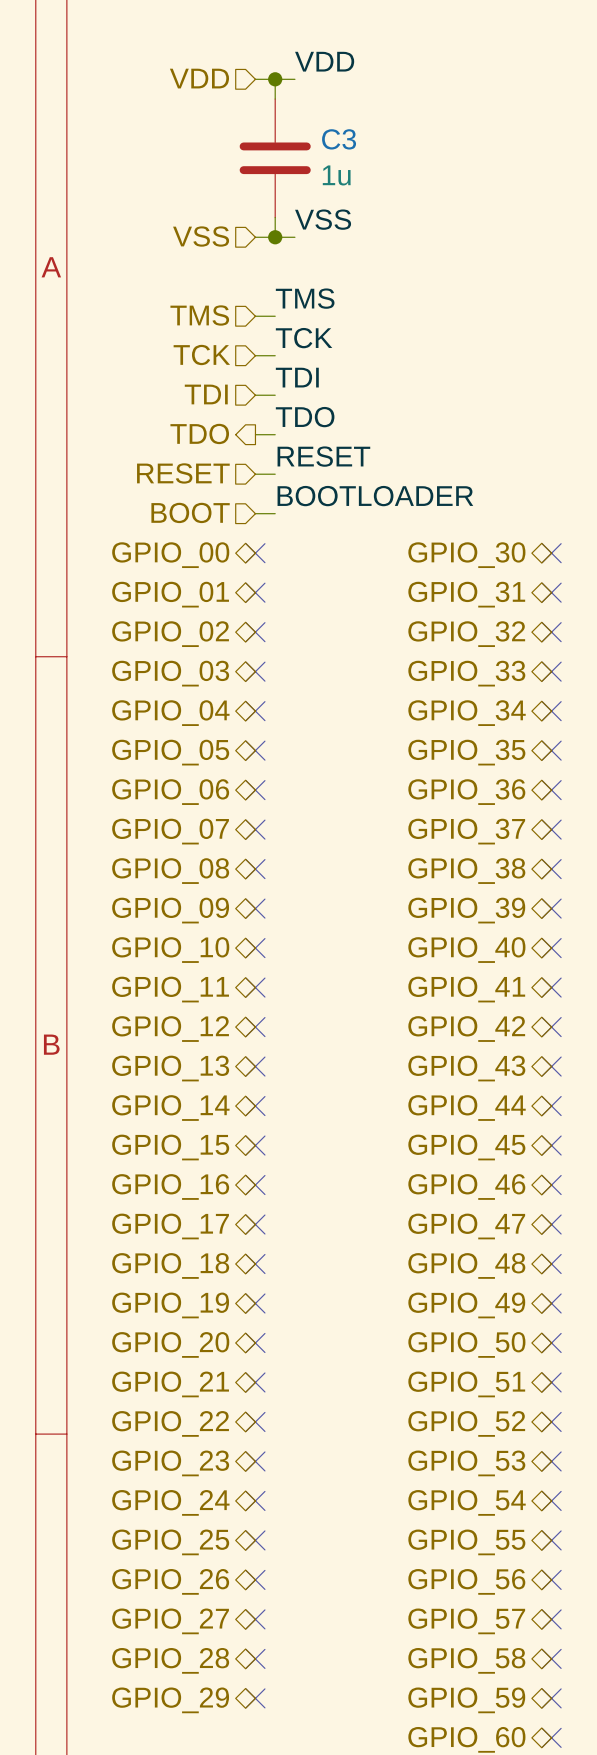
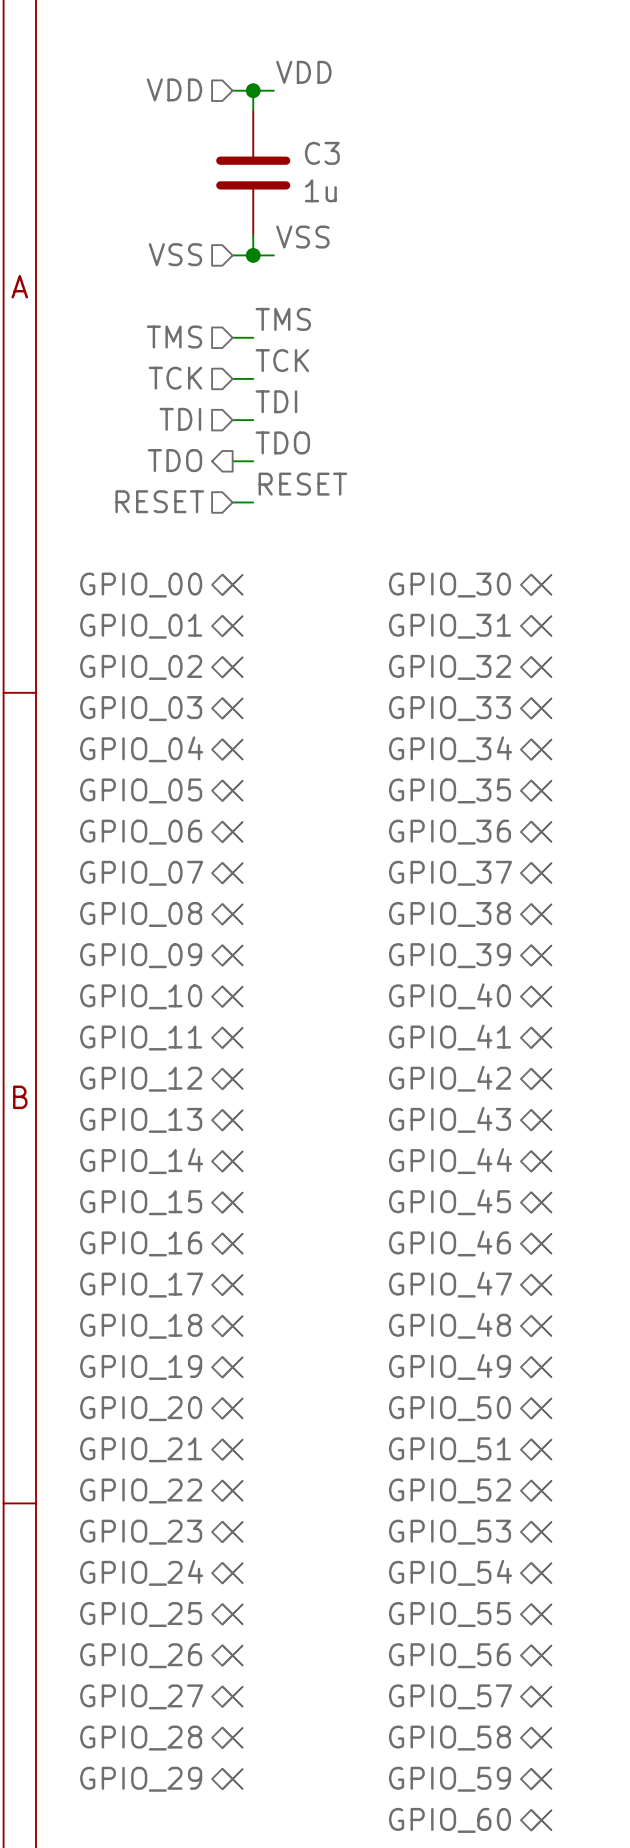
label: BOOTLOADER (375, 496) -> none
hierarchical label: BOOT (190, 512) -> none
wire: (255, 513) (275, 513) -> none

